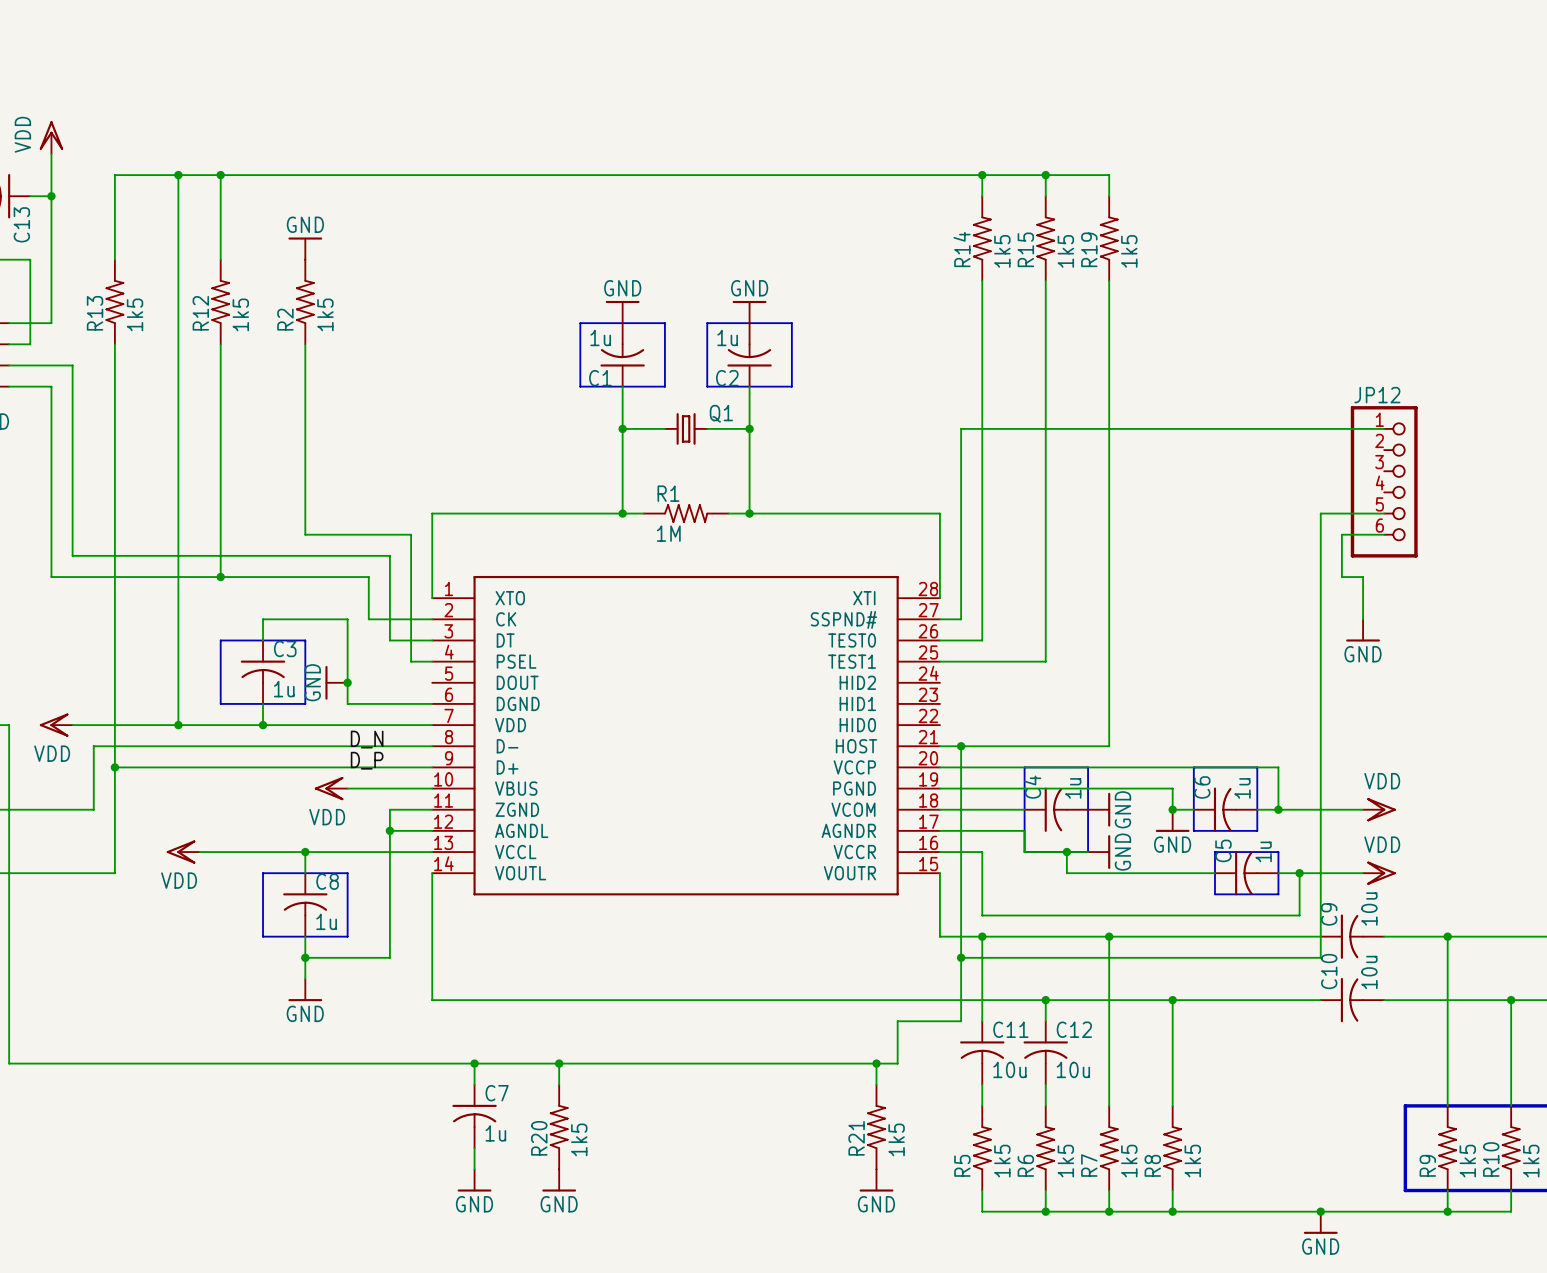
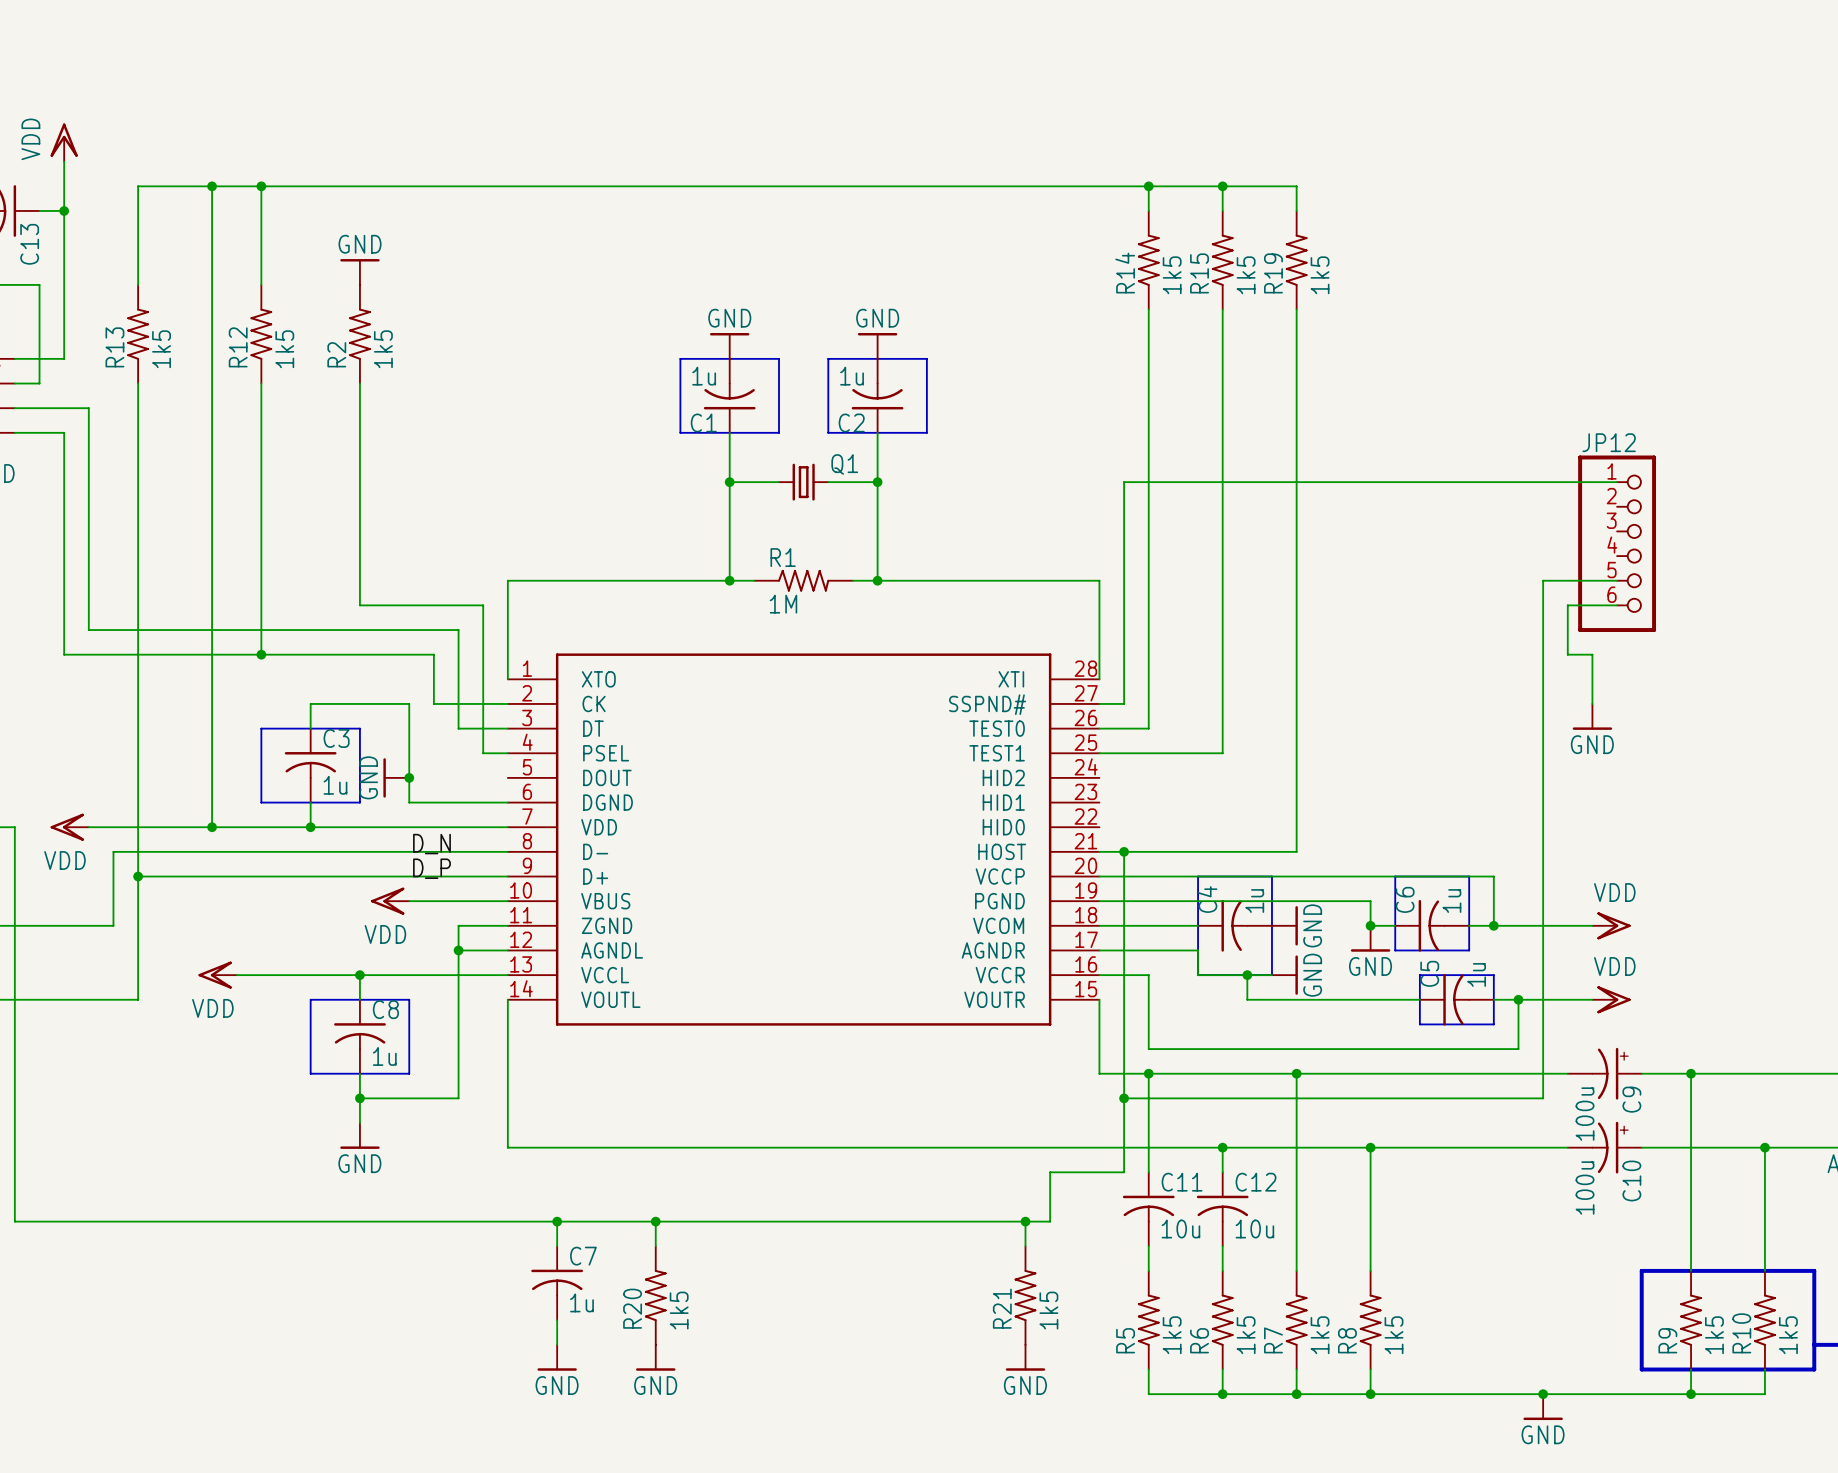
C9 value: 10u (1369, 909) -> 100u (1585, 1114)
C9 symbol: [1320, 914, 1385, 959] -> [1567, 1047, 1642, 1100]
C9 name position: C9 (1329, 914) -> C9 (1631, 1099)
C10 name position: C10 (1329, 971) -> C10 (1631, 1180)
C10 value: 10u (1369, 972) -> 100u (1585, 1188)
C10 symbol: [1320, 977, 1385, 1023] -> [1567, 1121, 1642, 1174]

